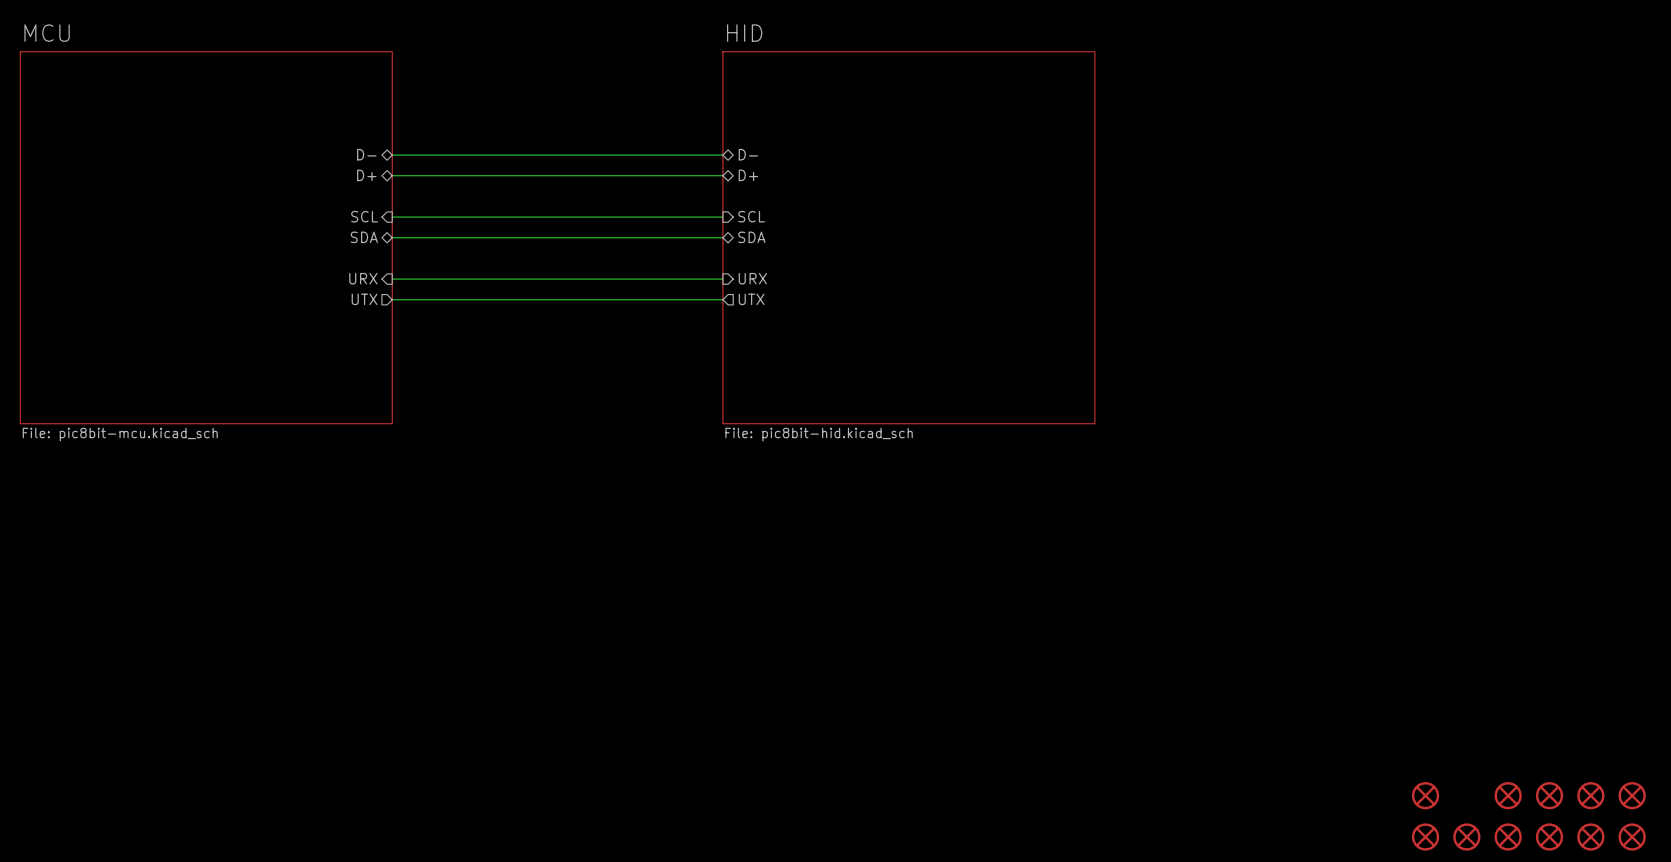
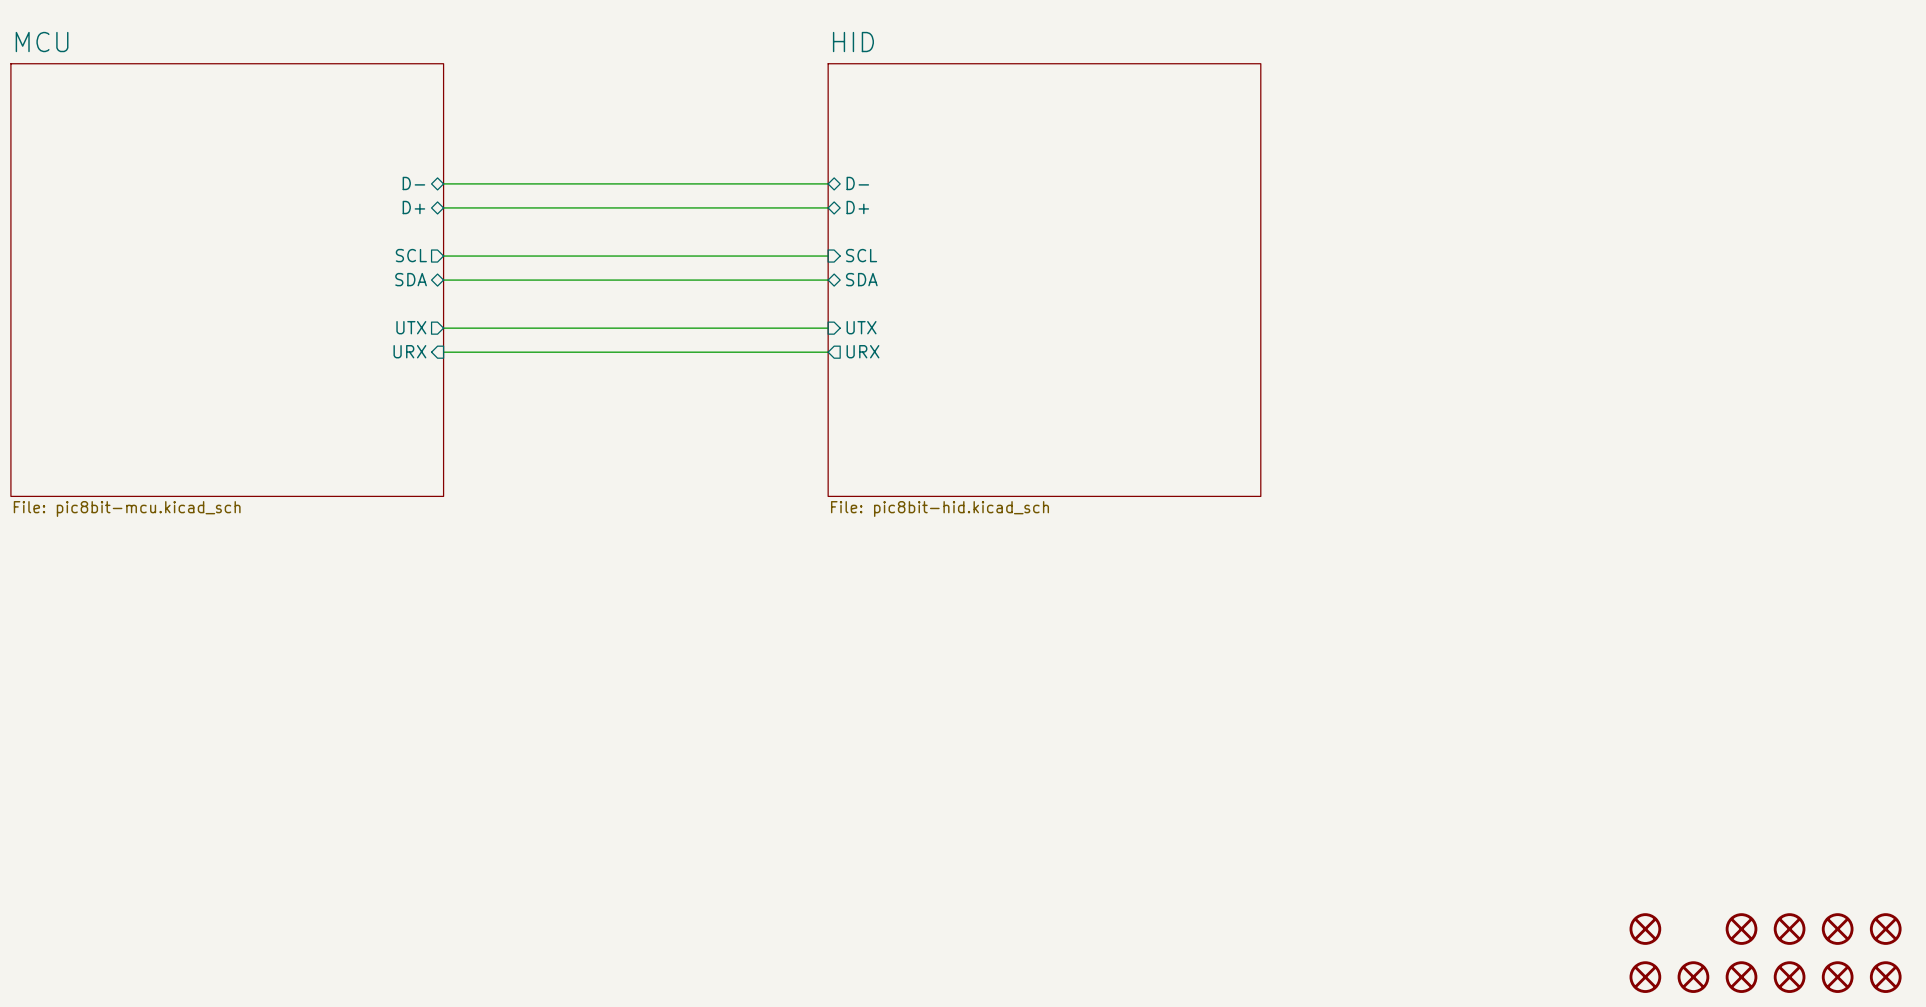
sheet pin shape: input (364, 216) -> output (411, 255)
sheet pin shape: input (363, 278) -> output (411, 327)
sheet pin: URX (363, 278) -> UTX (411, 327)
sheet pin: URX (752, 278) -> UTX (861, 327)
sheet pin shape: output (364, 299) -> input (409, 351)
sheet pin: UTX (364, 299) -> URX (409, 351)
sheet pin: UTX (751, 299) -> URX (862, 351)

